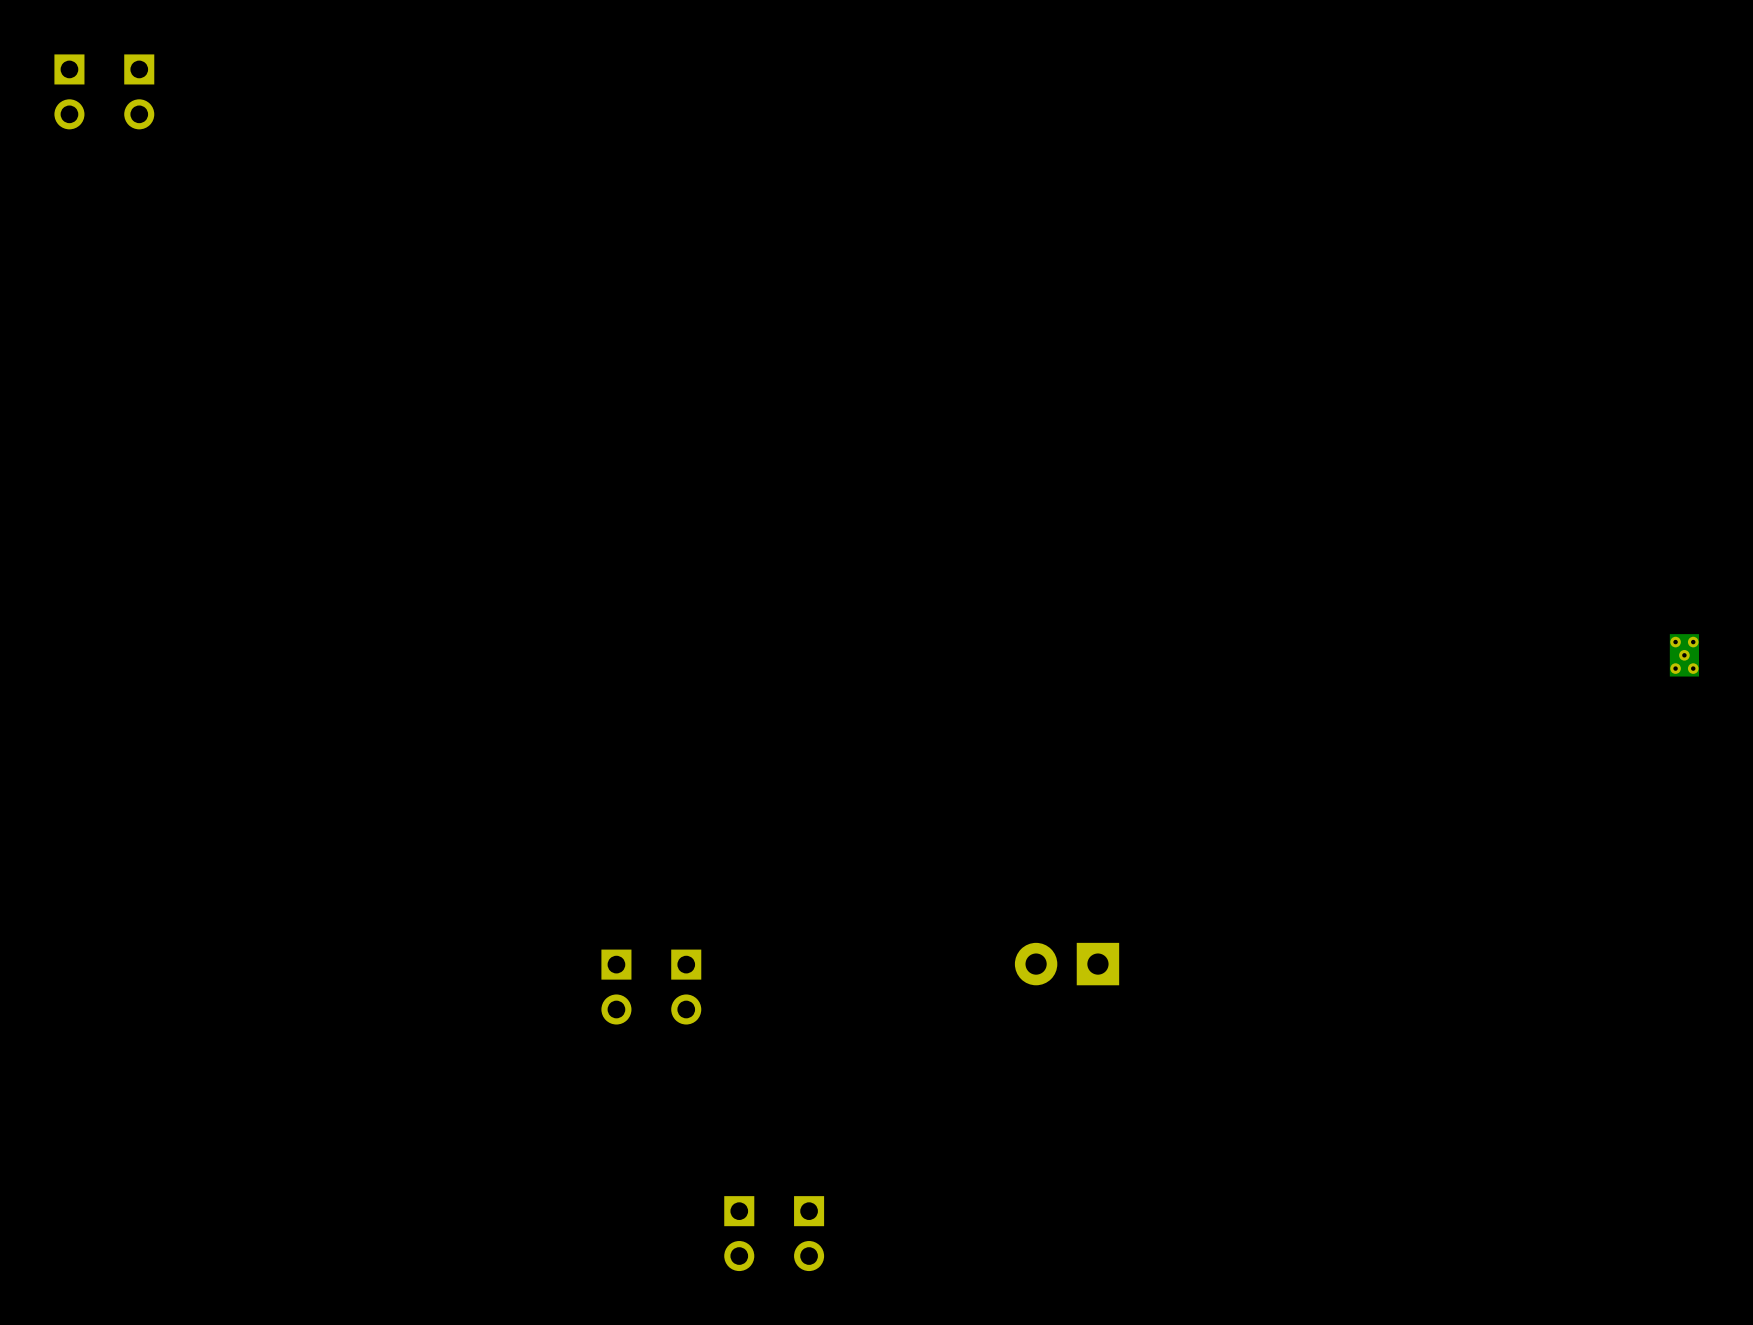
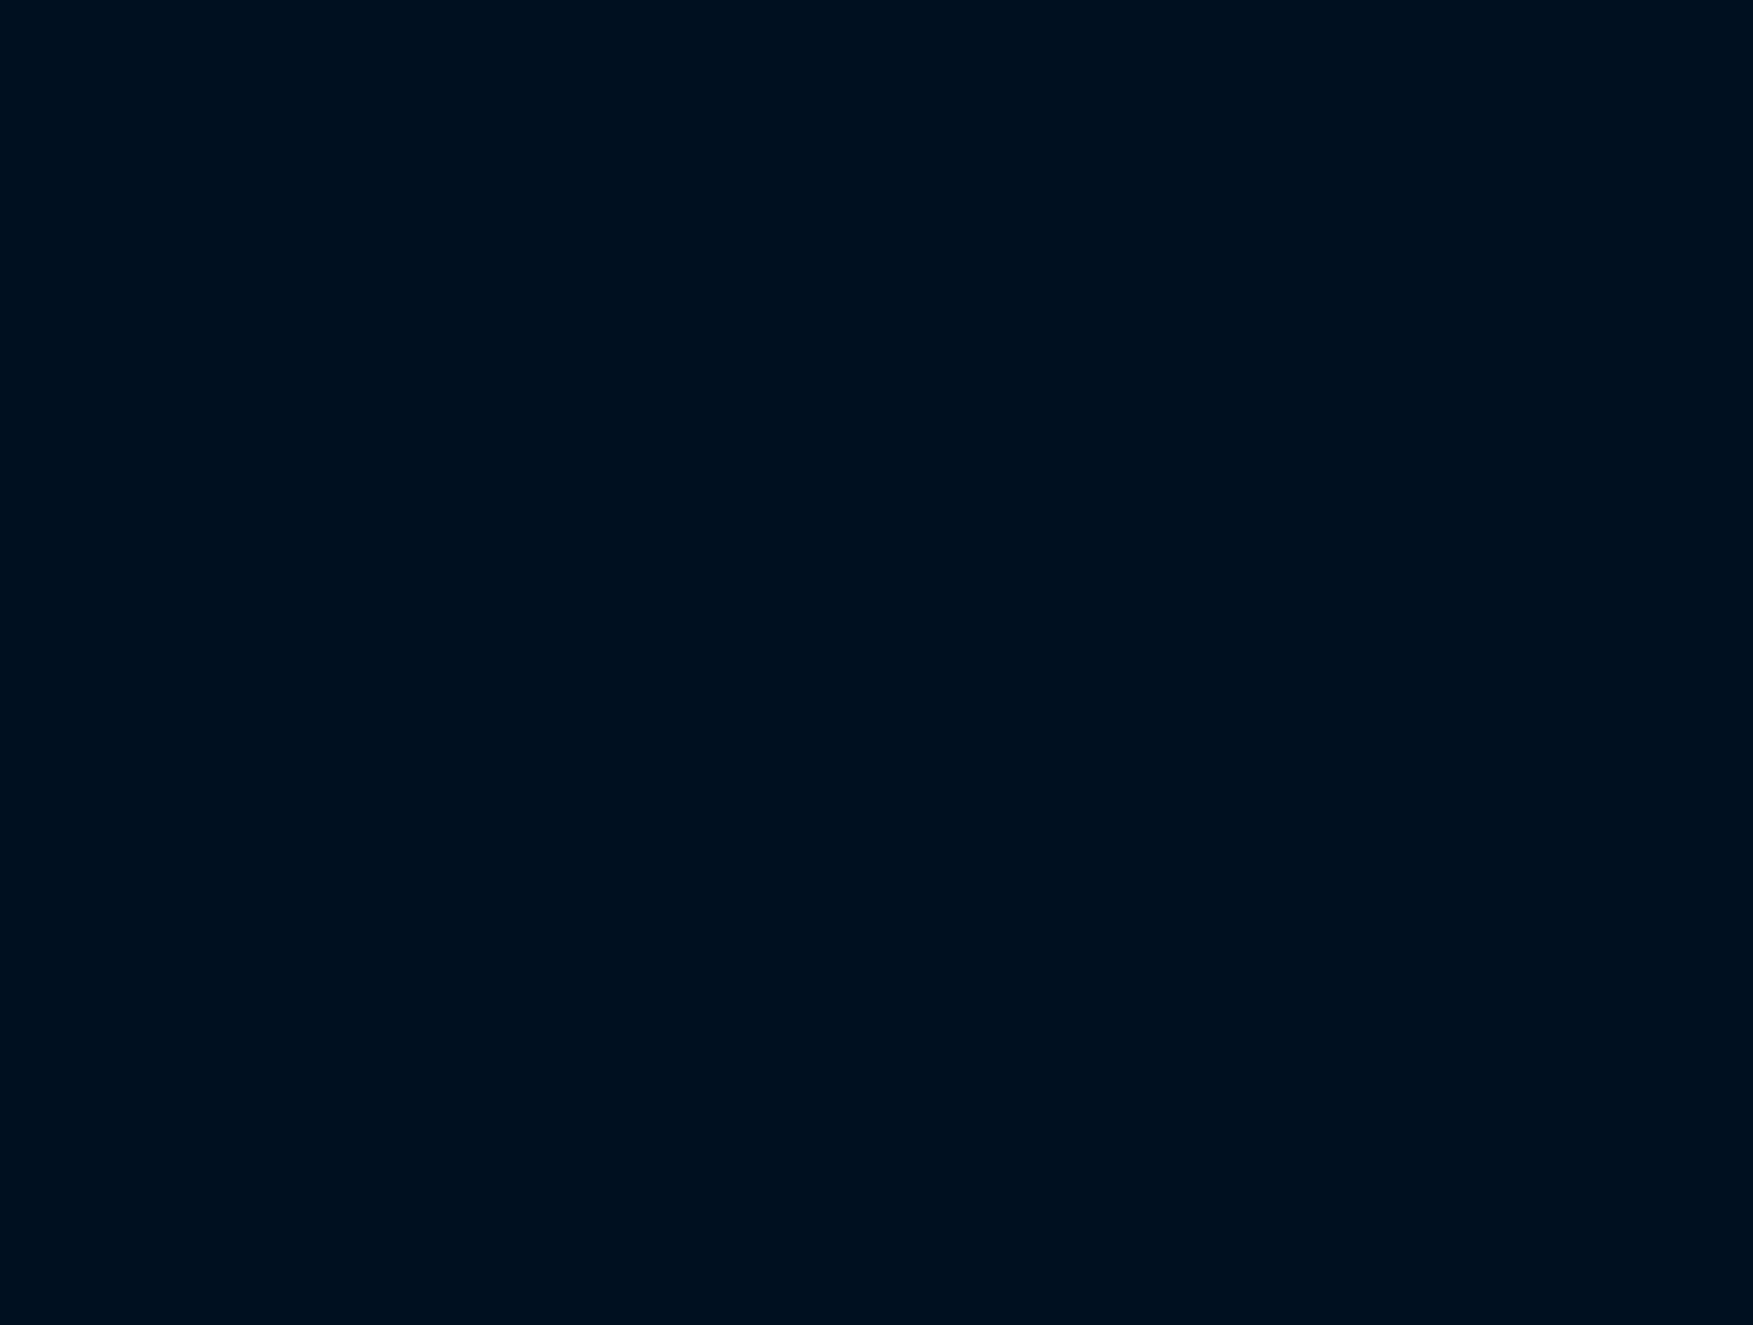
part: (69, 91) -> none
part: (139, 91) -> none
part: (1684, 655) -> none
part: (1067, 964) -> none
part: (616, 987) -> none
part: (686, 987) -> none
part: (739, 1233) -> none
part: (809, 1233) -> none

